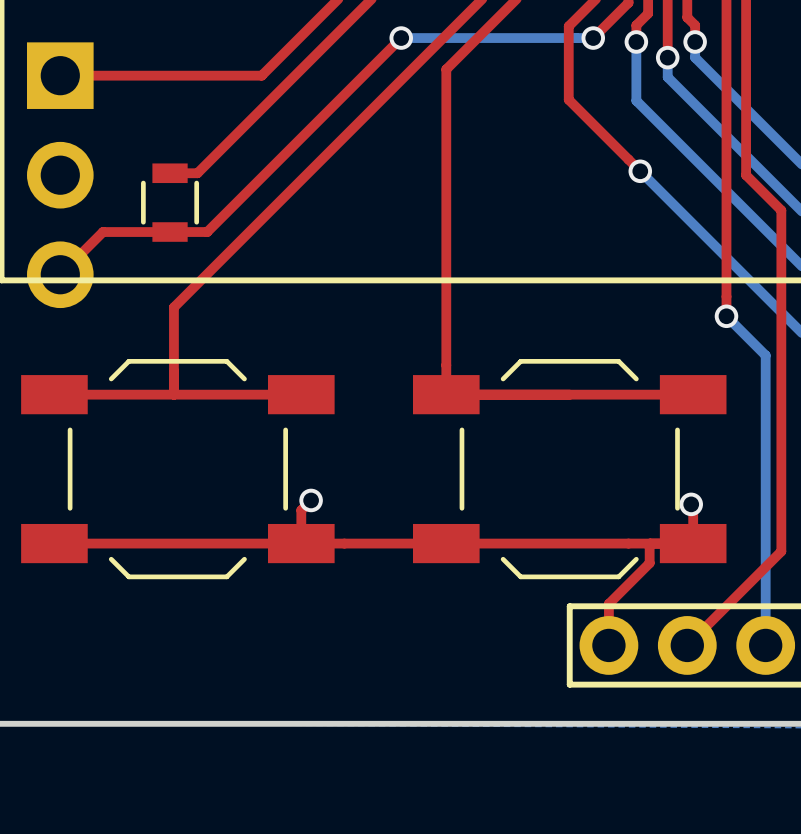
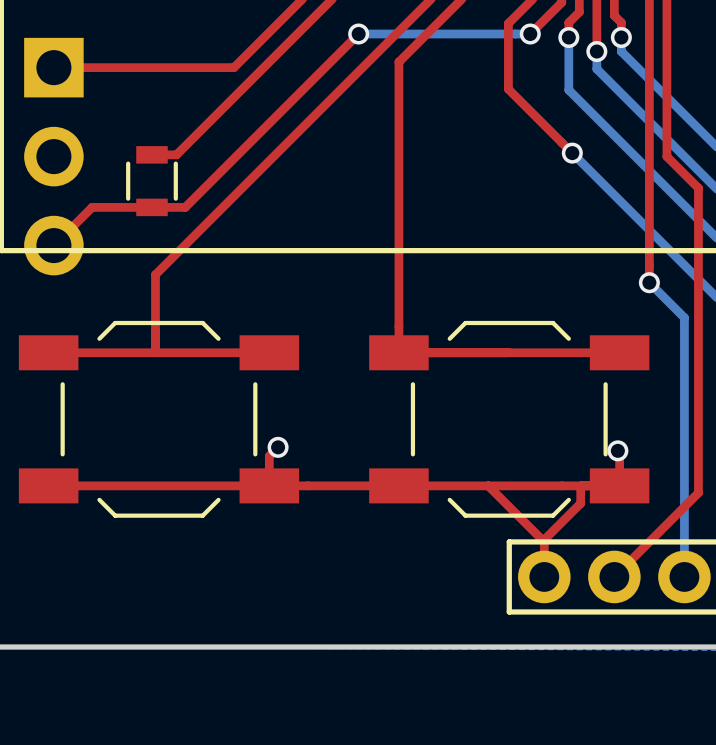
top track: none -> (488, 485) (544, 539)

